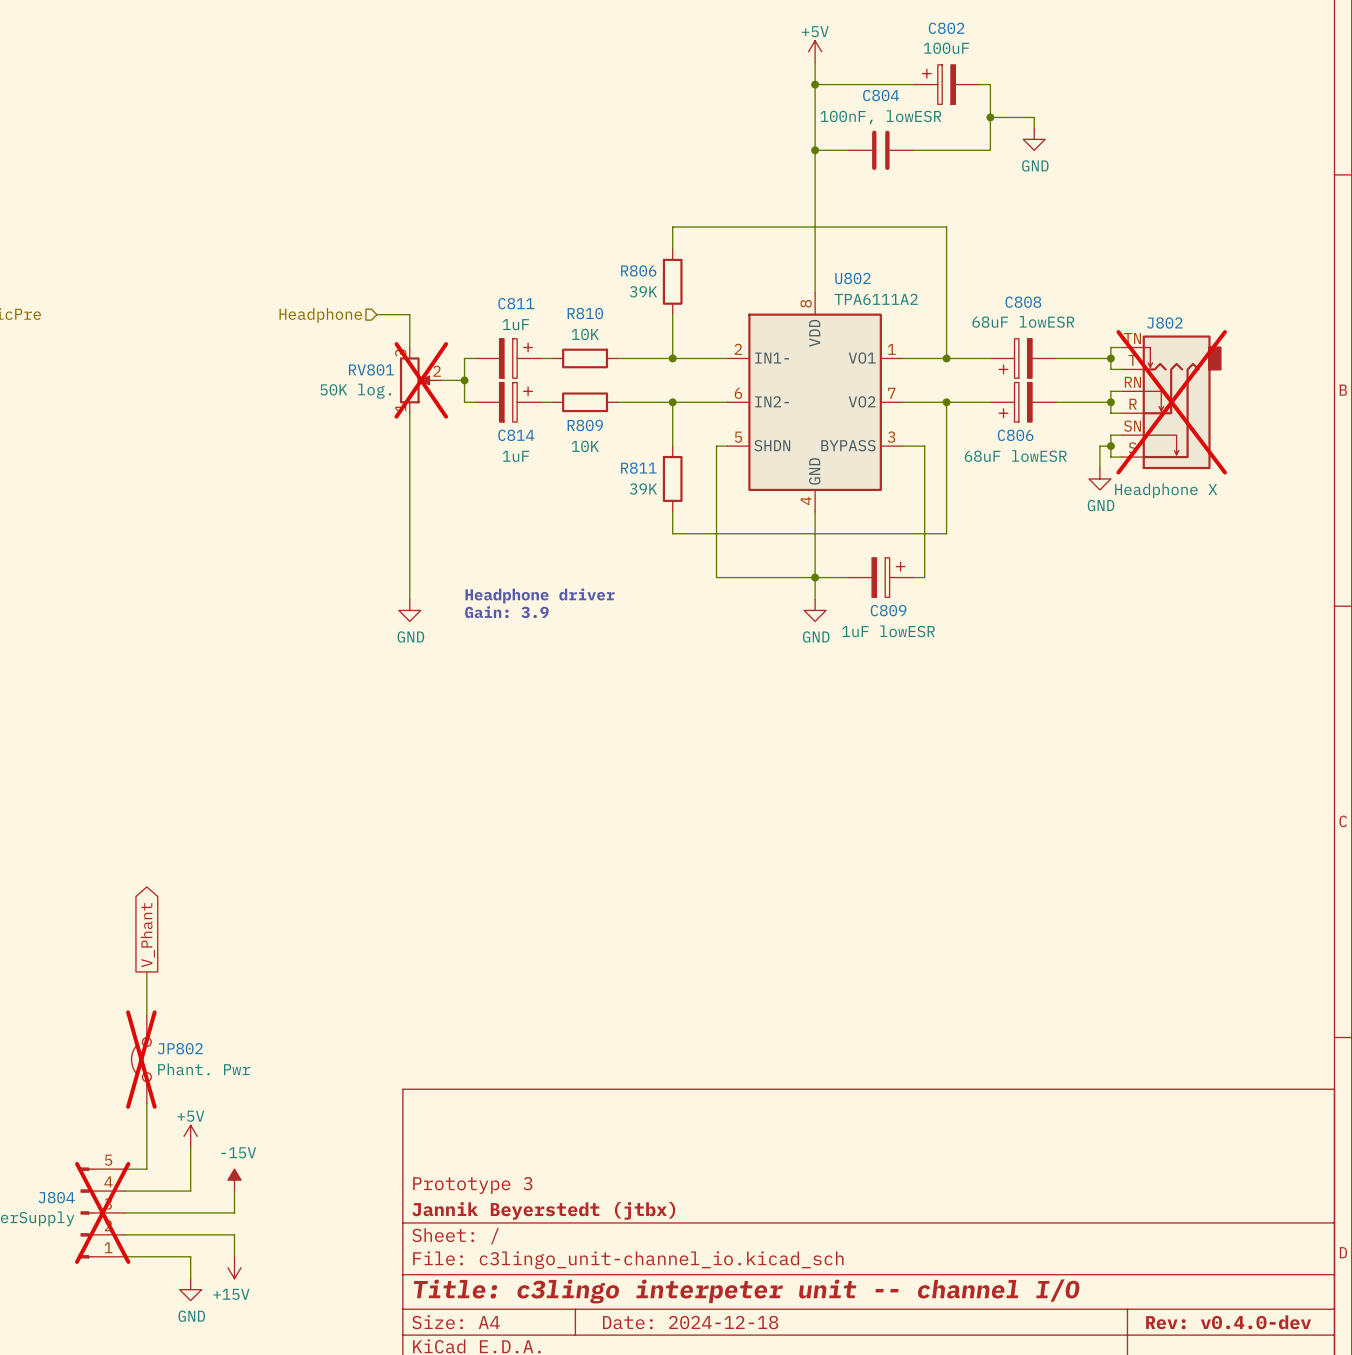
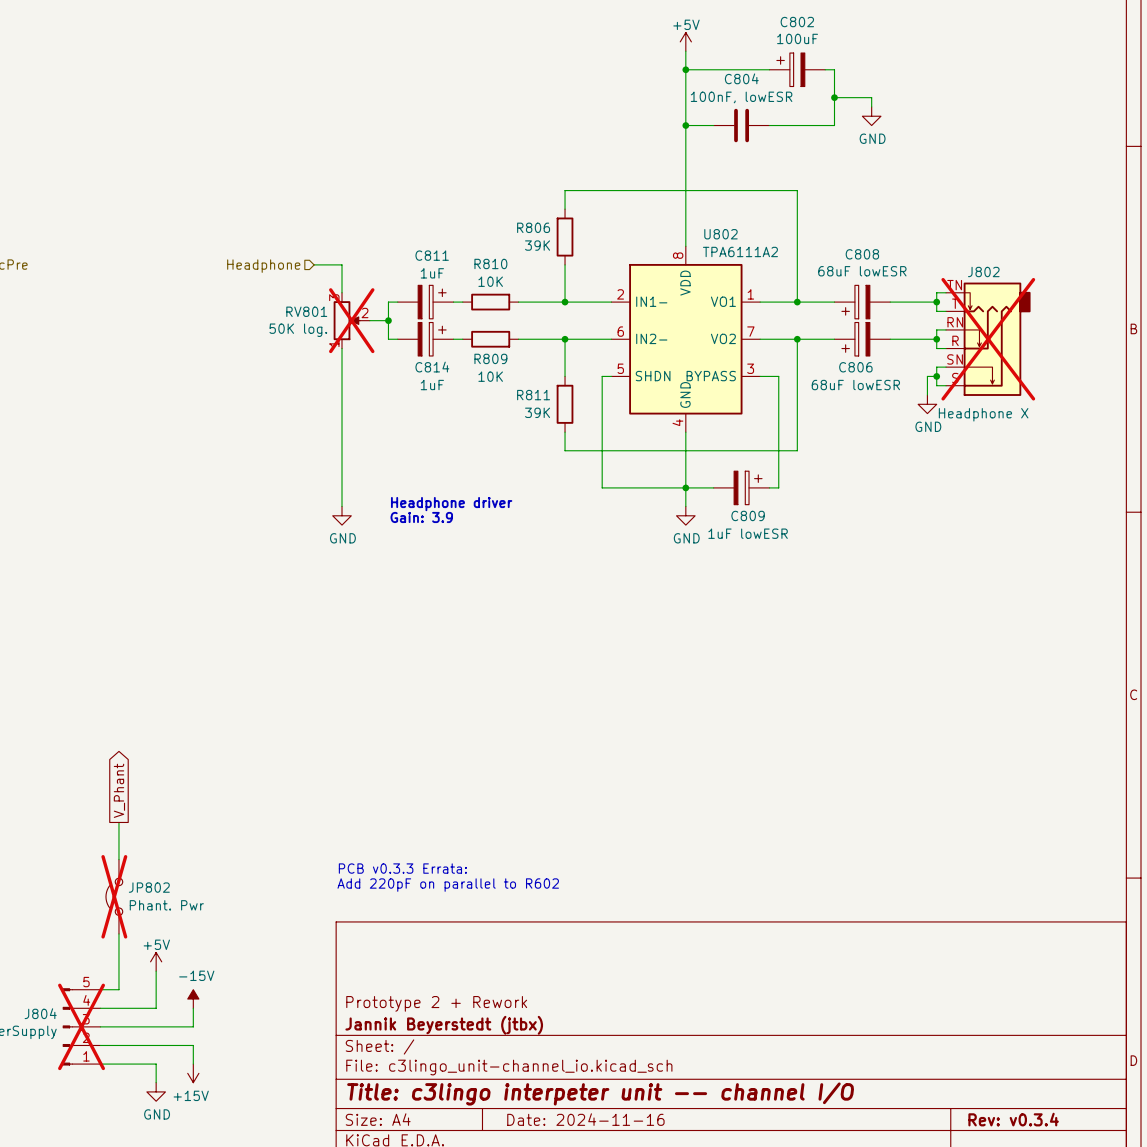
text: none -> PCB v0.3.3 Errata: (402, 868)
text: none -> Add 220pF on parallel to R602 (448, 885)
title block: Prototype 3 (472, 1185) -> Prototype 2 + Rework (436, 1003)
title block: Date: 2024-12-18 (690, 1322) -> Date: 2024-11-16 (585, 1119)
title block: Rev: v0.4.0-dev (1228, 1322) -> Rev: v0.3.4 (1013, 1119)

